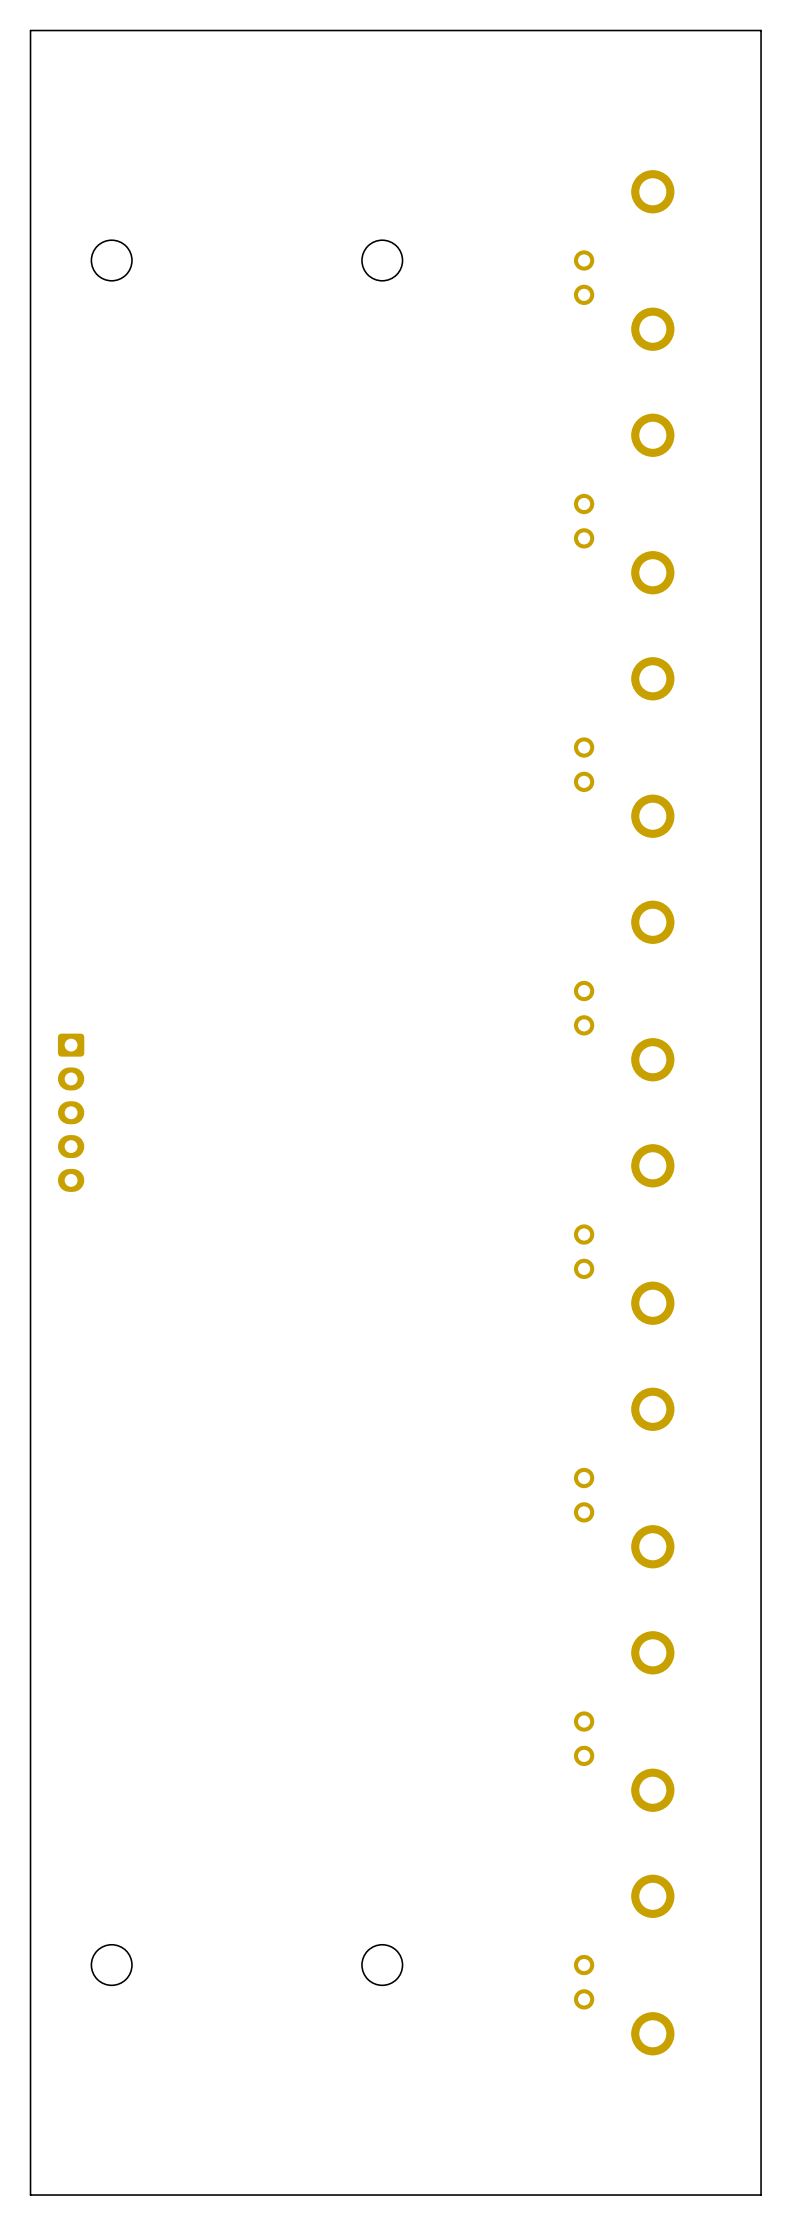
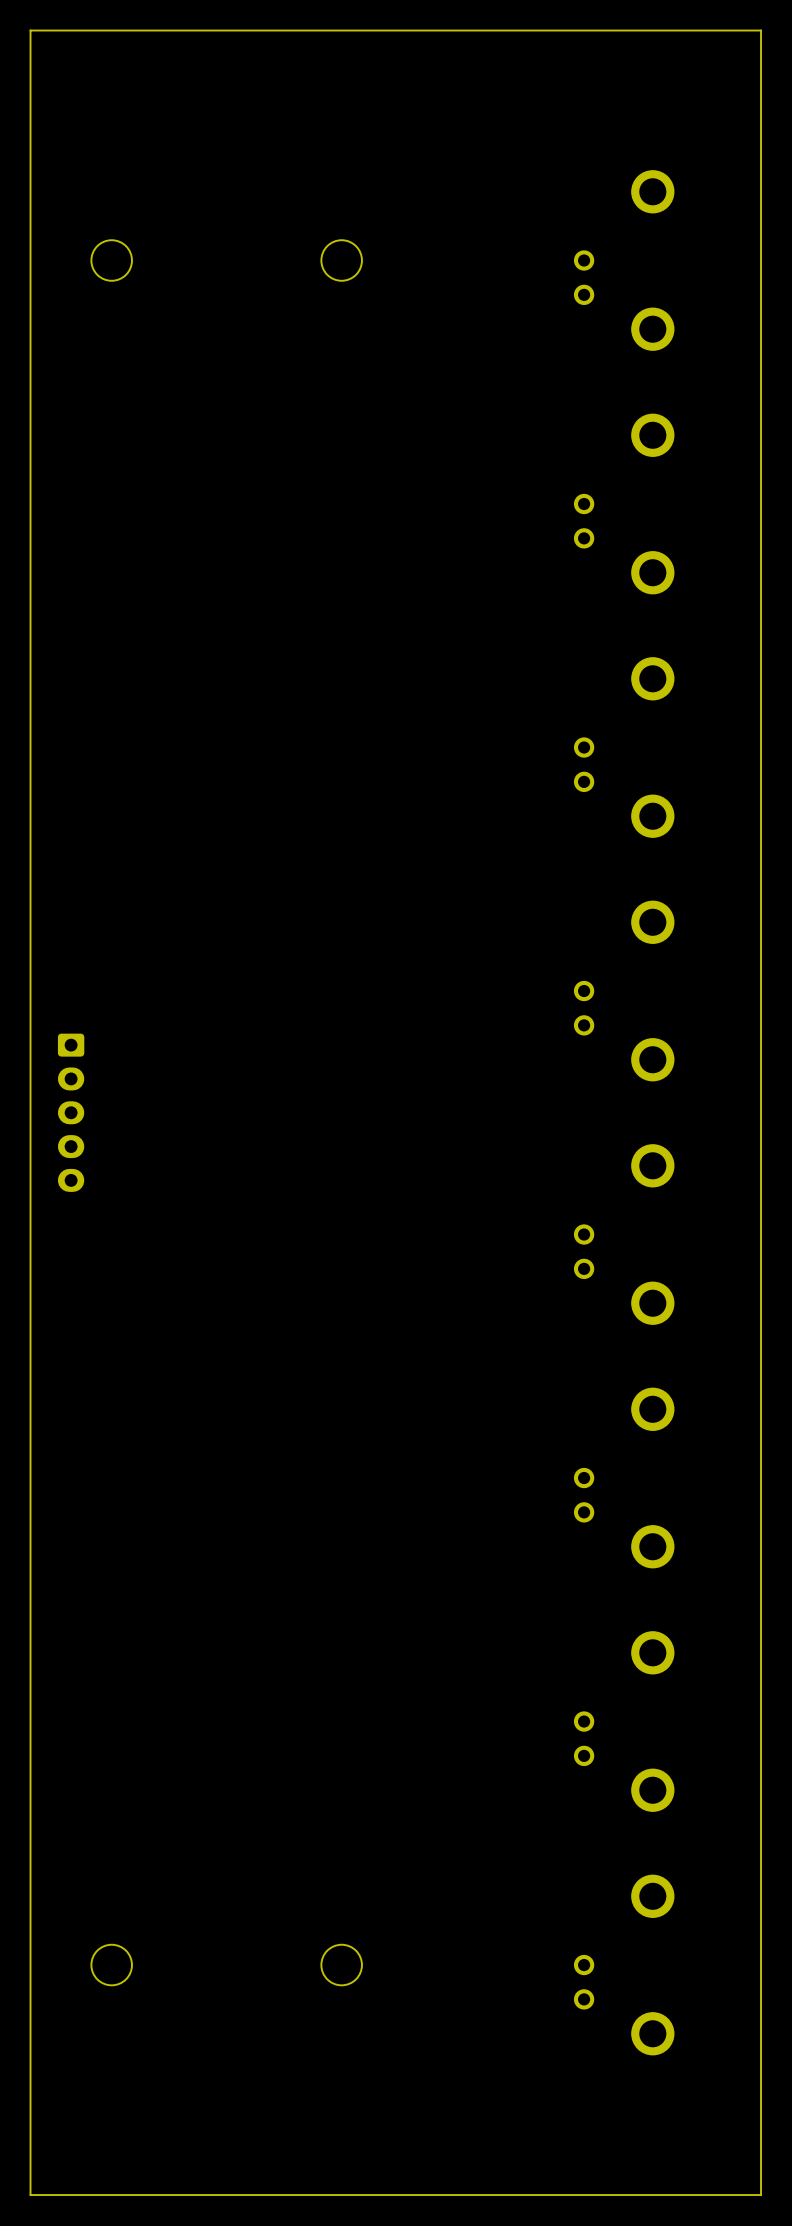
round board edge position: (382, 260) -> (341, 260)
round board edge position: (382, 1965) -> (341, 1965)

